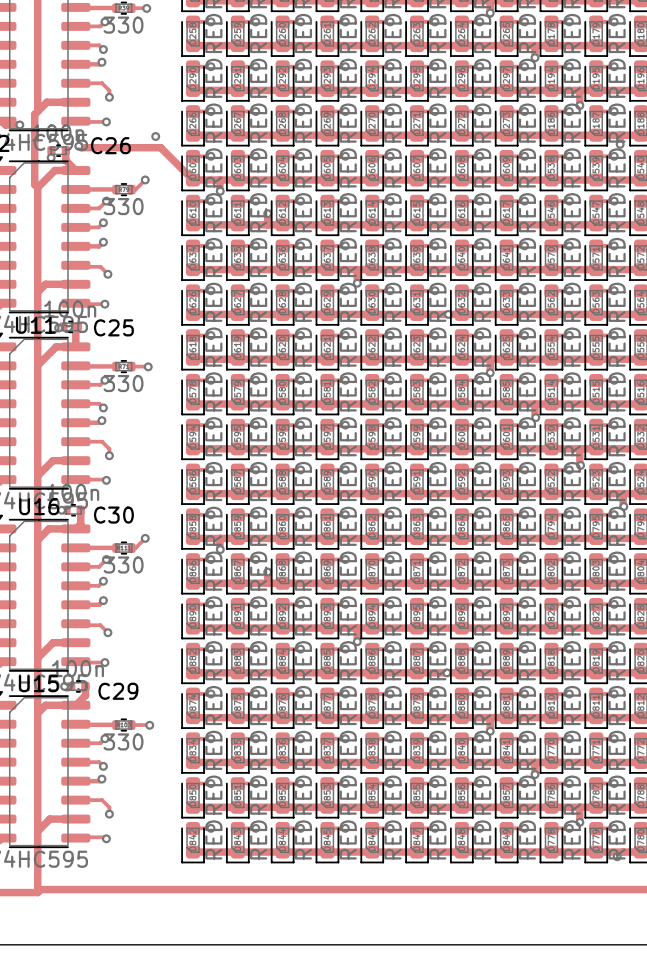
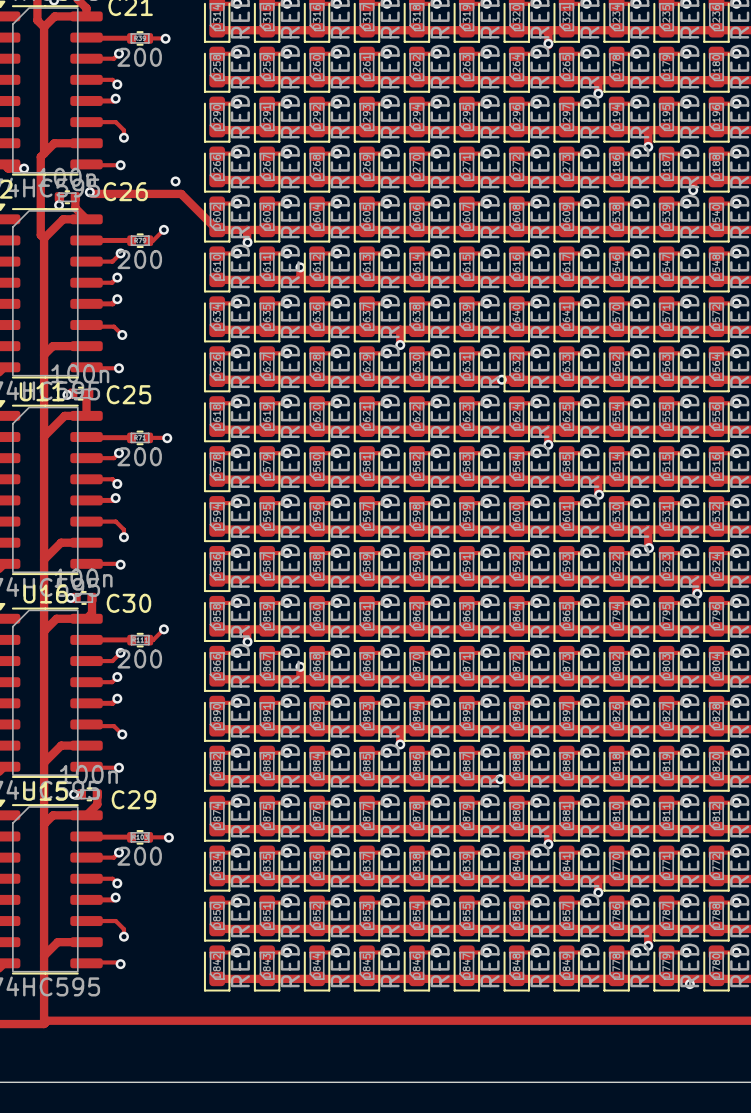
part value: 330 (123, 25) -> 200 (139, 57)
part value: 330 (123, 206) -> 200 (139, 259)
part value: 330 (123, 383) -> 200 (139, 456)
part value: 330 (123, 564) -> 200 (139, 658)
part value: 330 (123, 741) -> 200 (139, 856)

